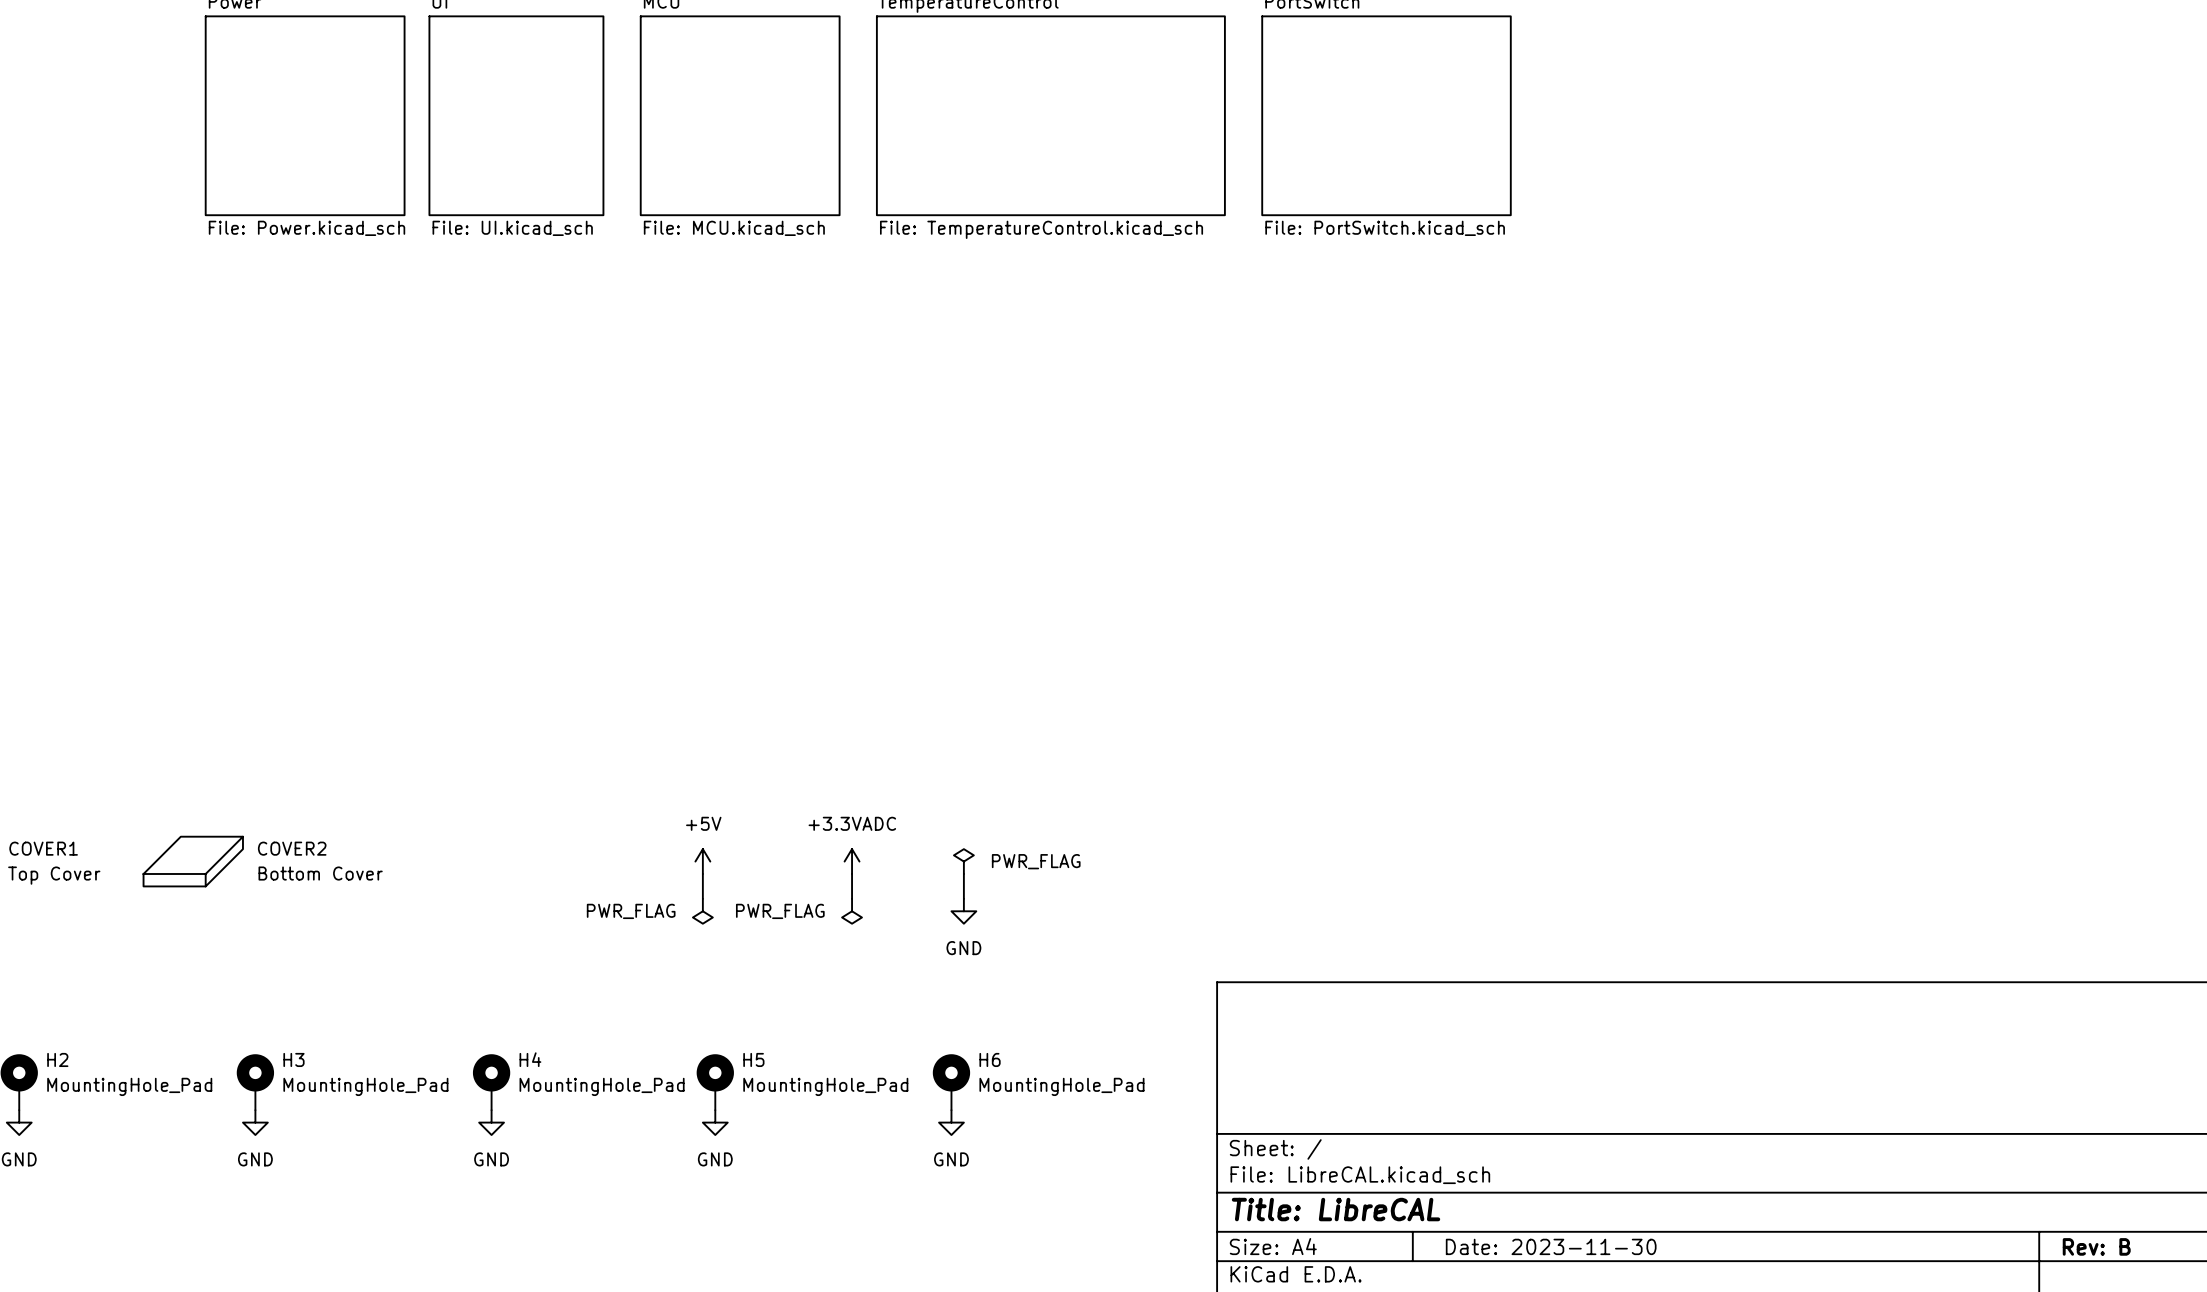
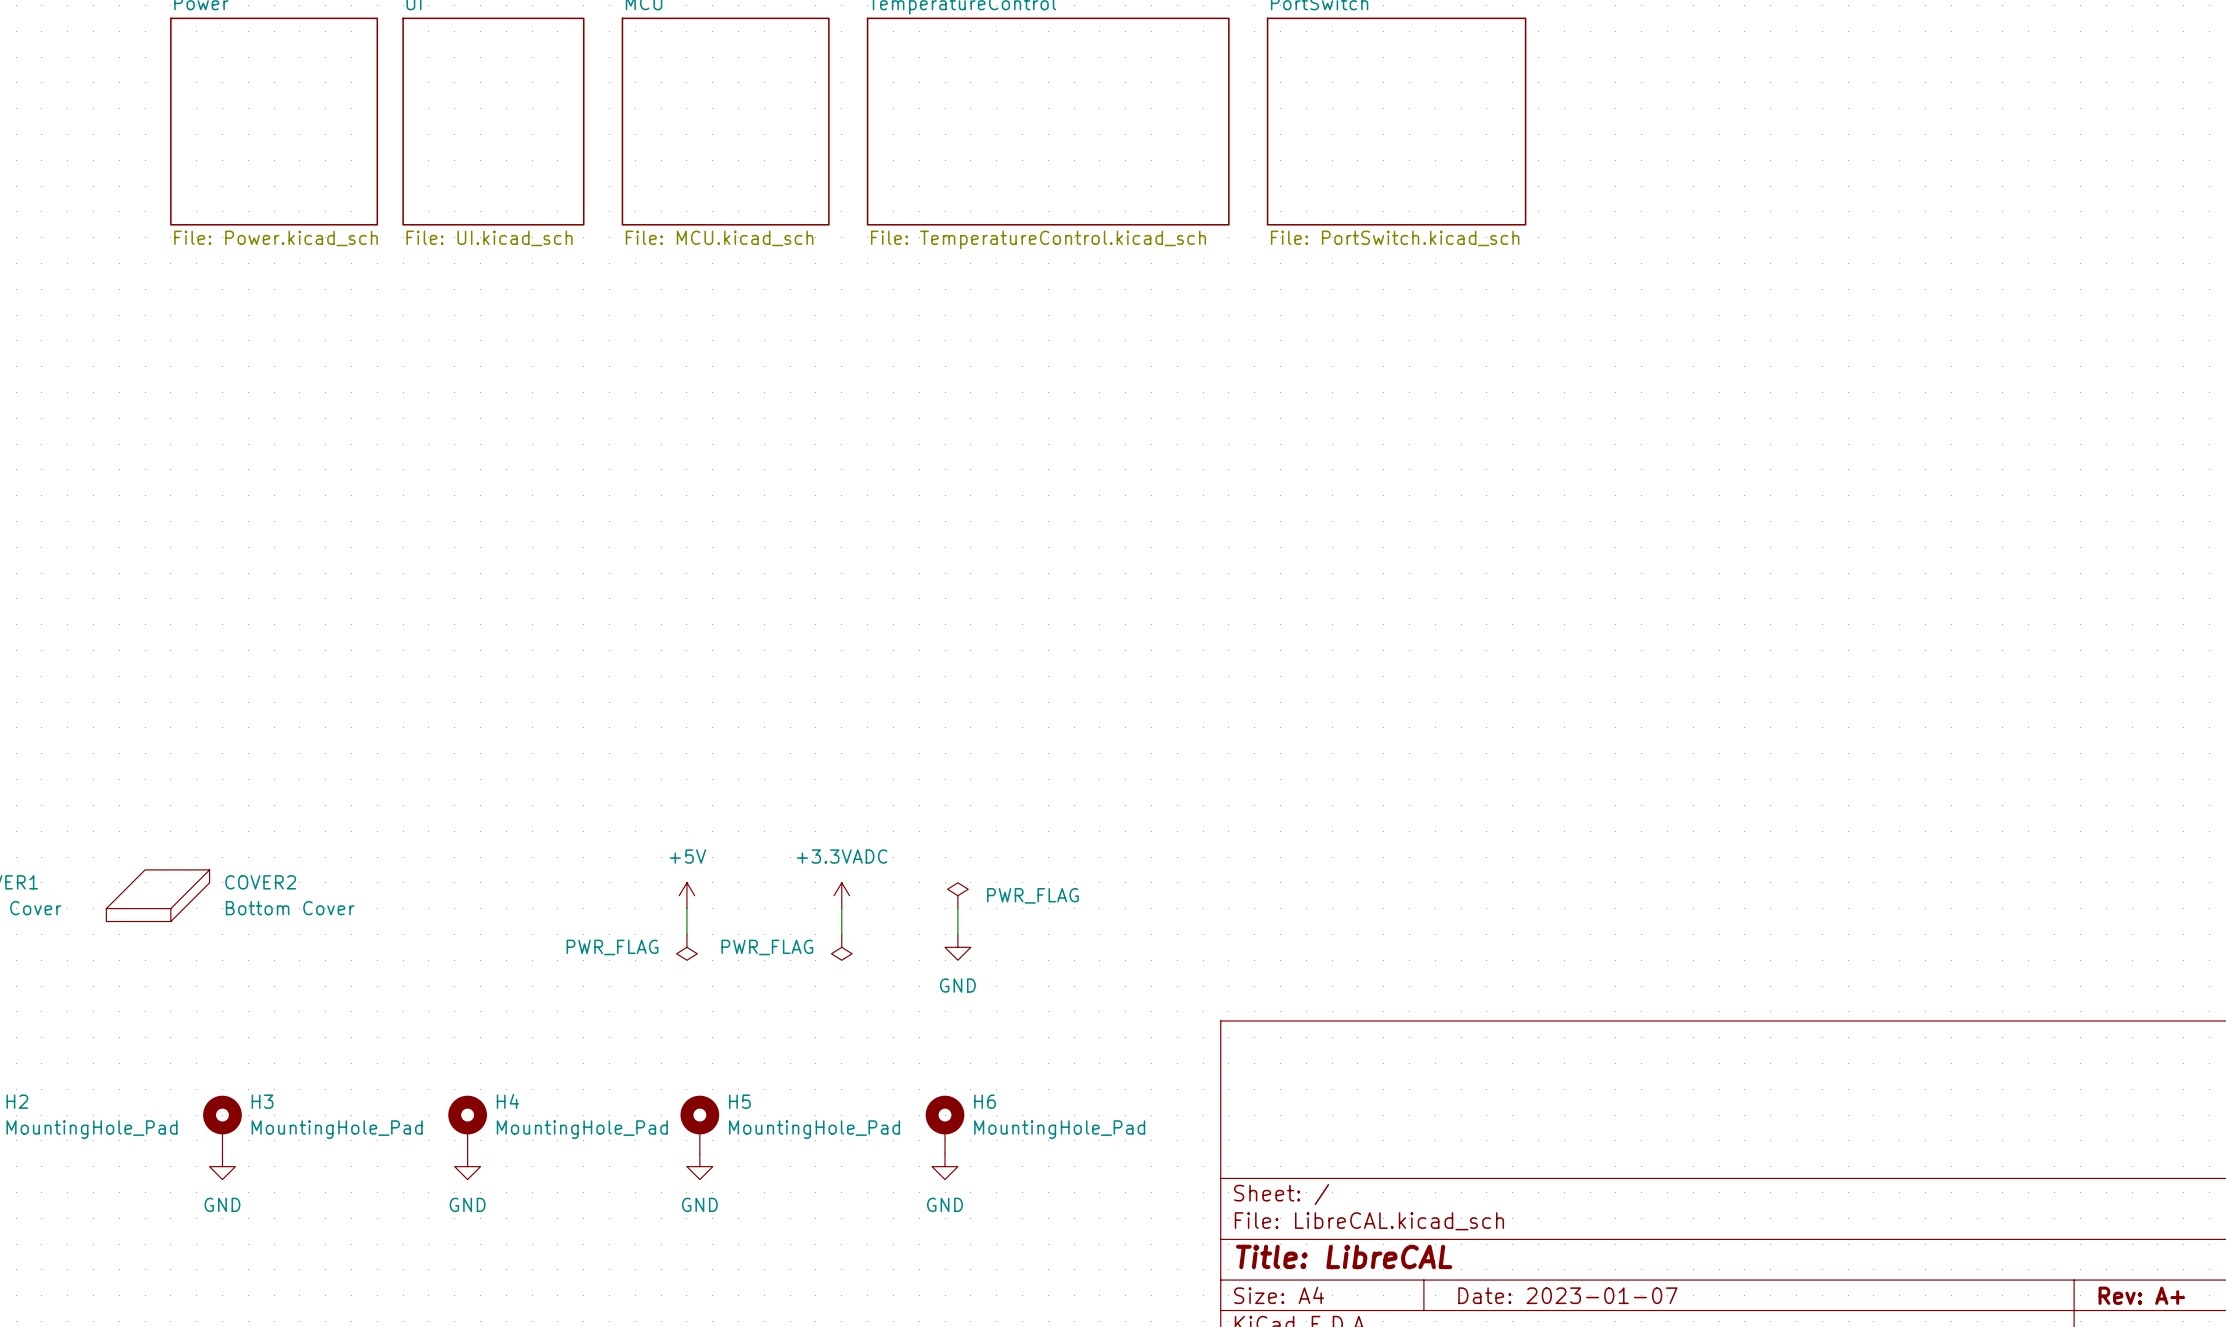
title block: Date: 2023-11-30 (1551, 1246) -> Date: 2023-01-07 (1567, 1295)
title block: Rev: B (2096, 1246) -> Rev: A+ (2141, 1295)

